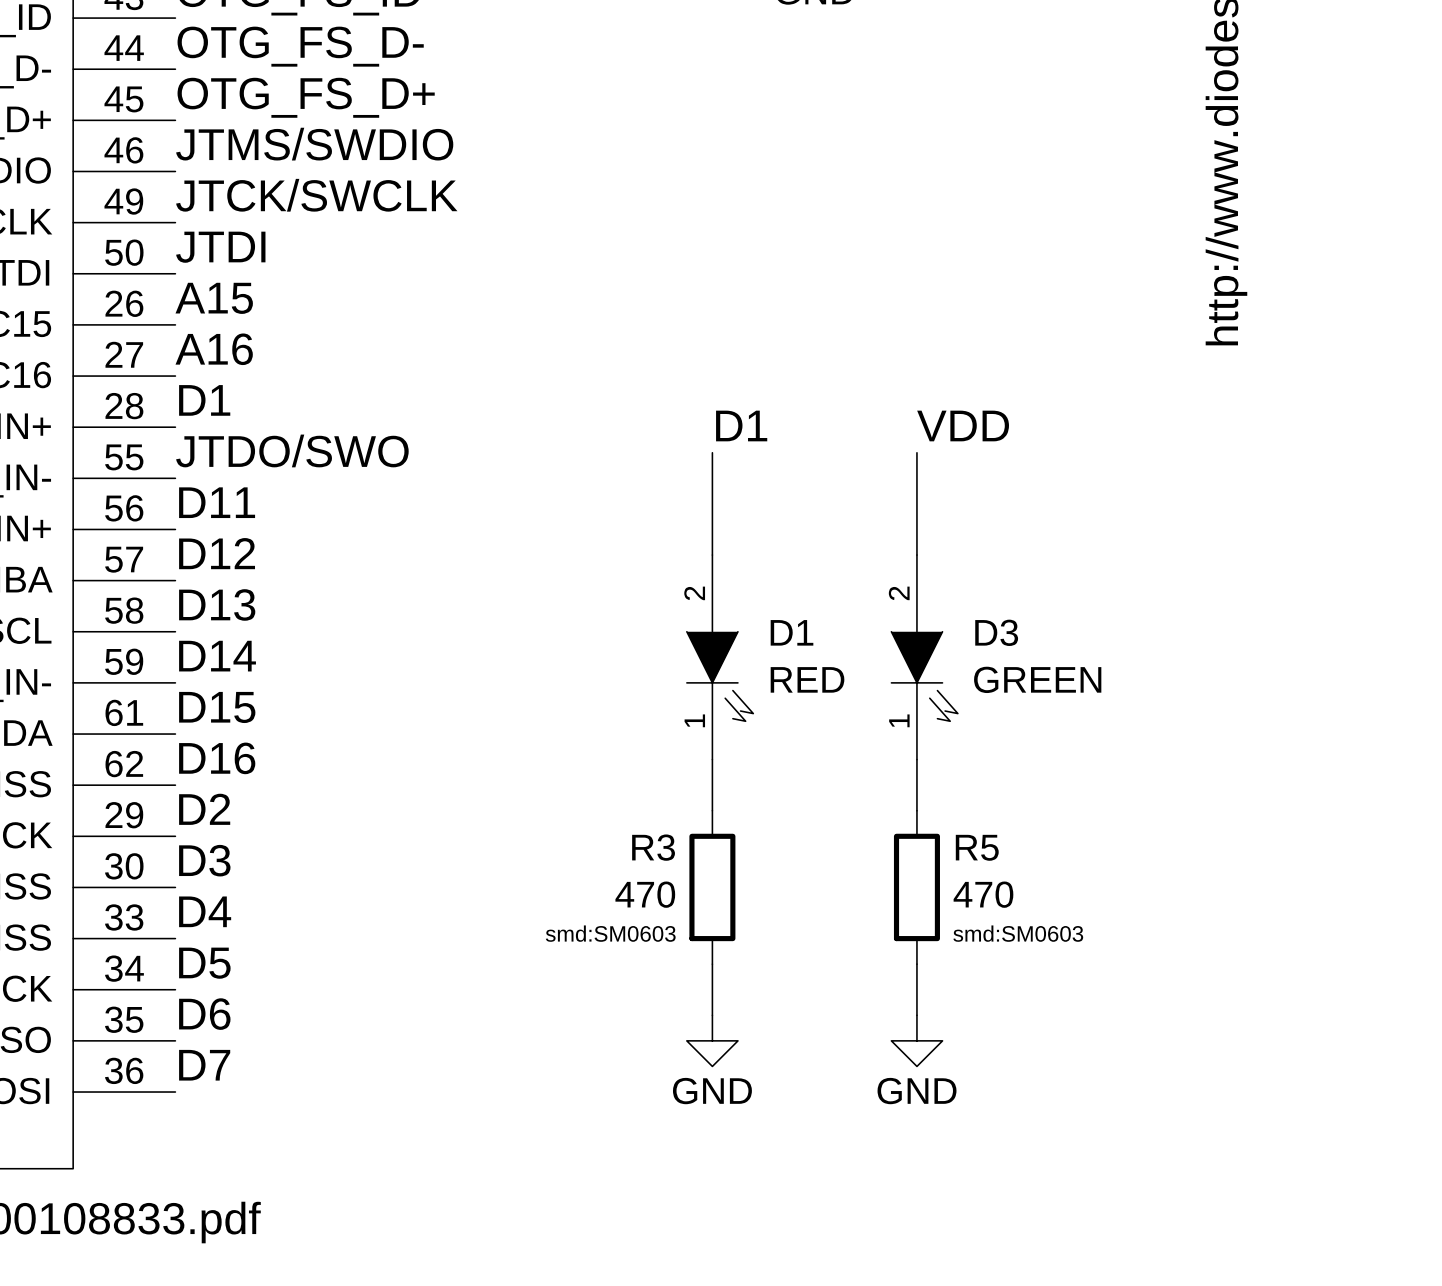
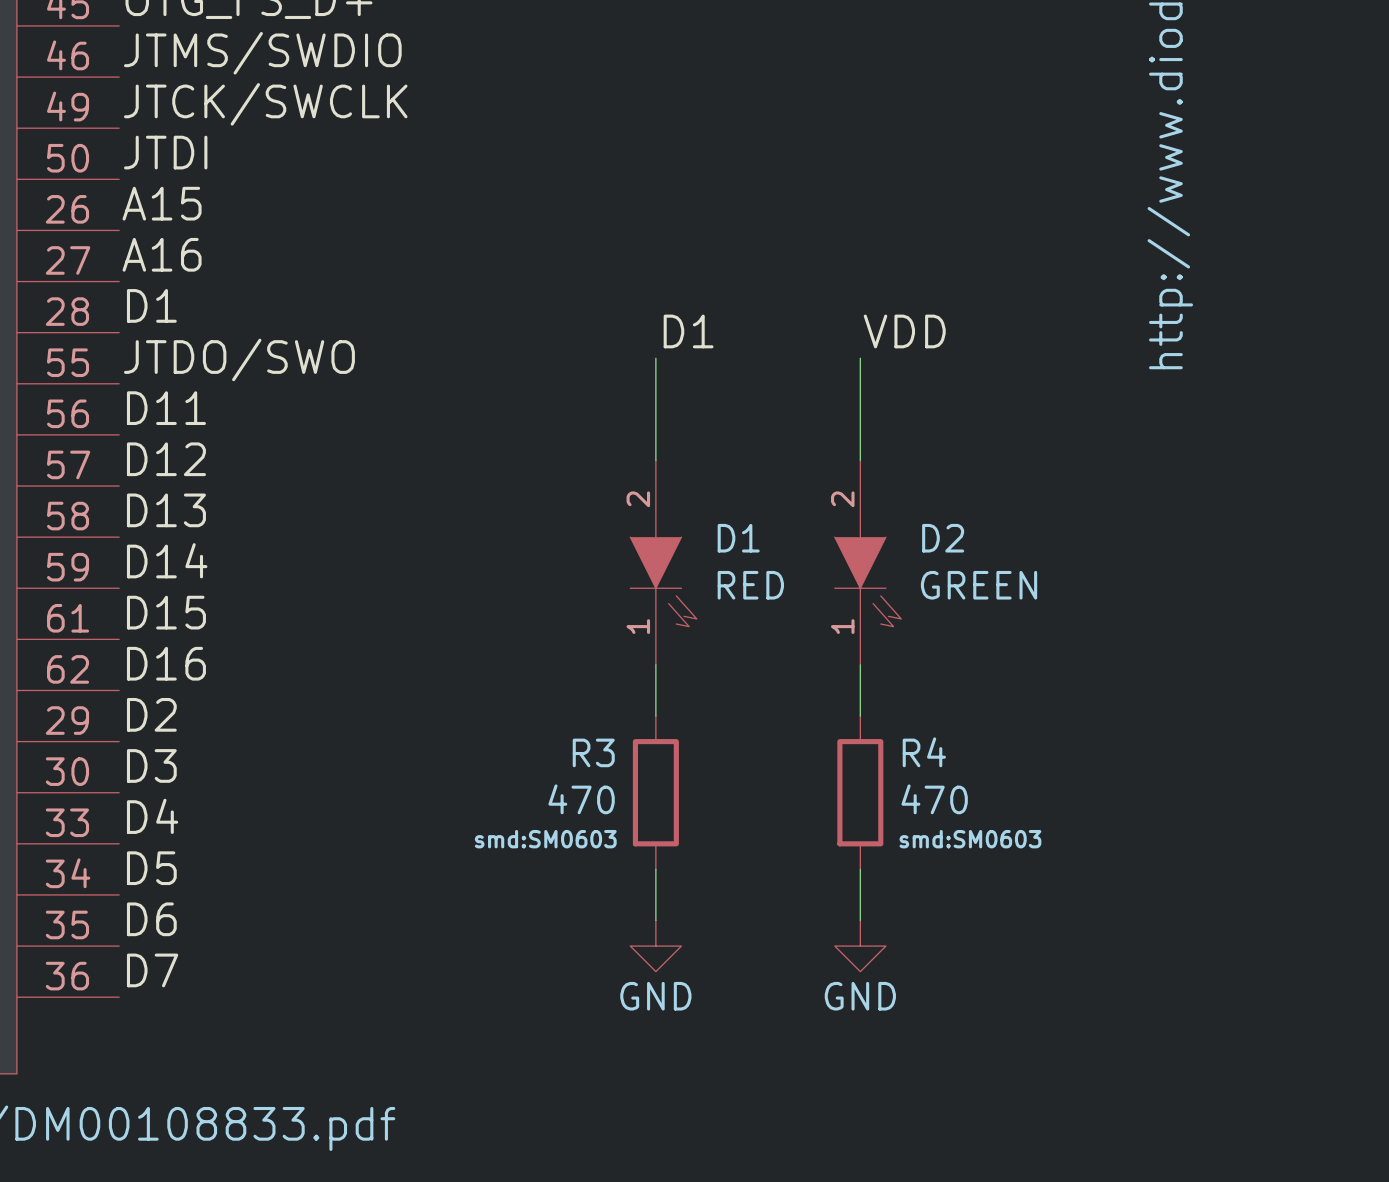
D3 name: D3 (996, 632) -> D2 (943, 538)
R5 name: R5 (977, 847) -> R4 (924, 752)

